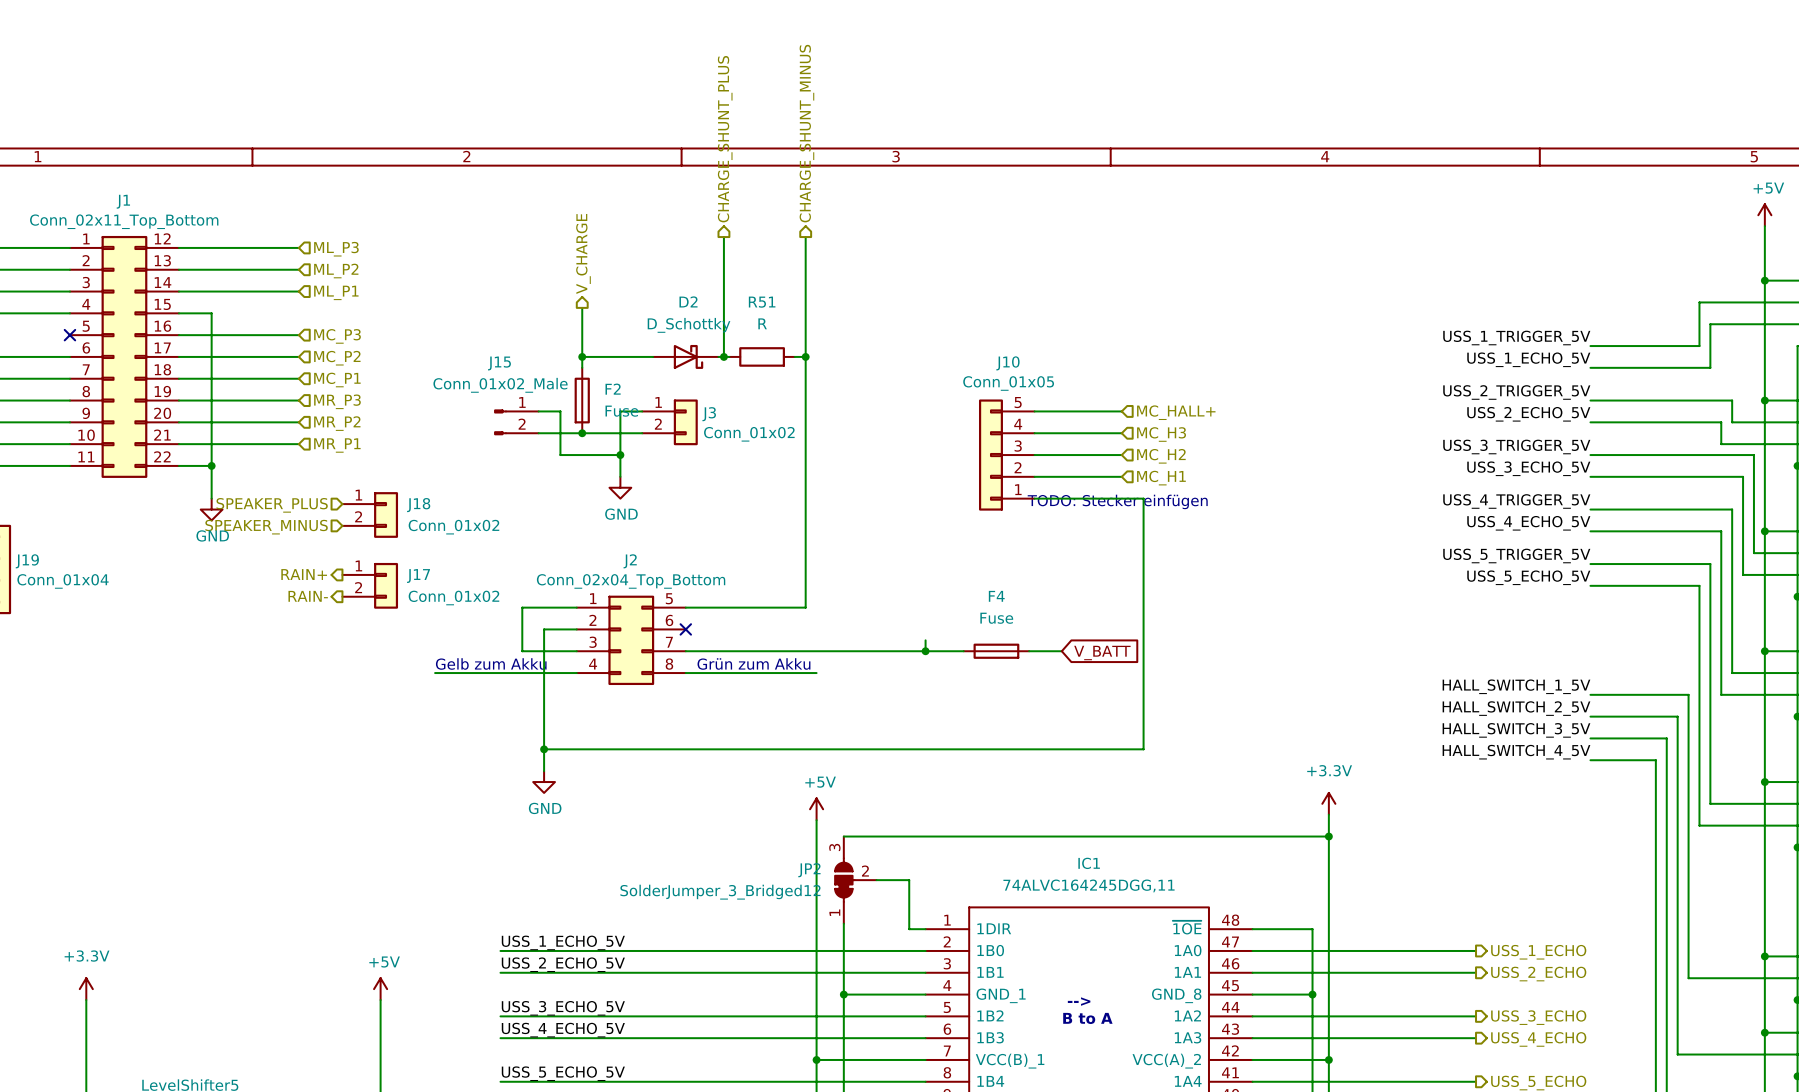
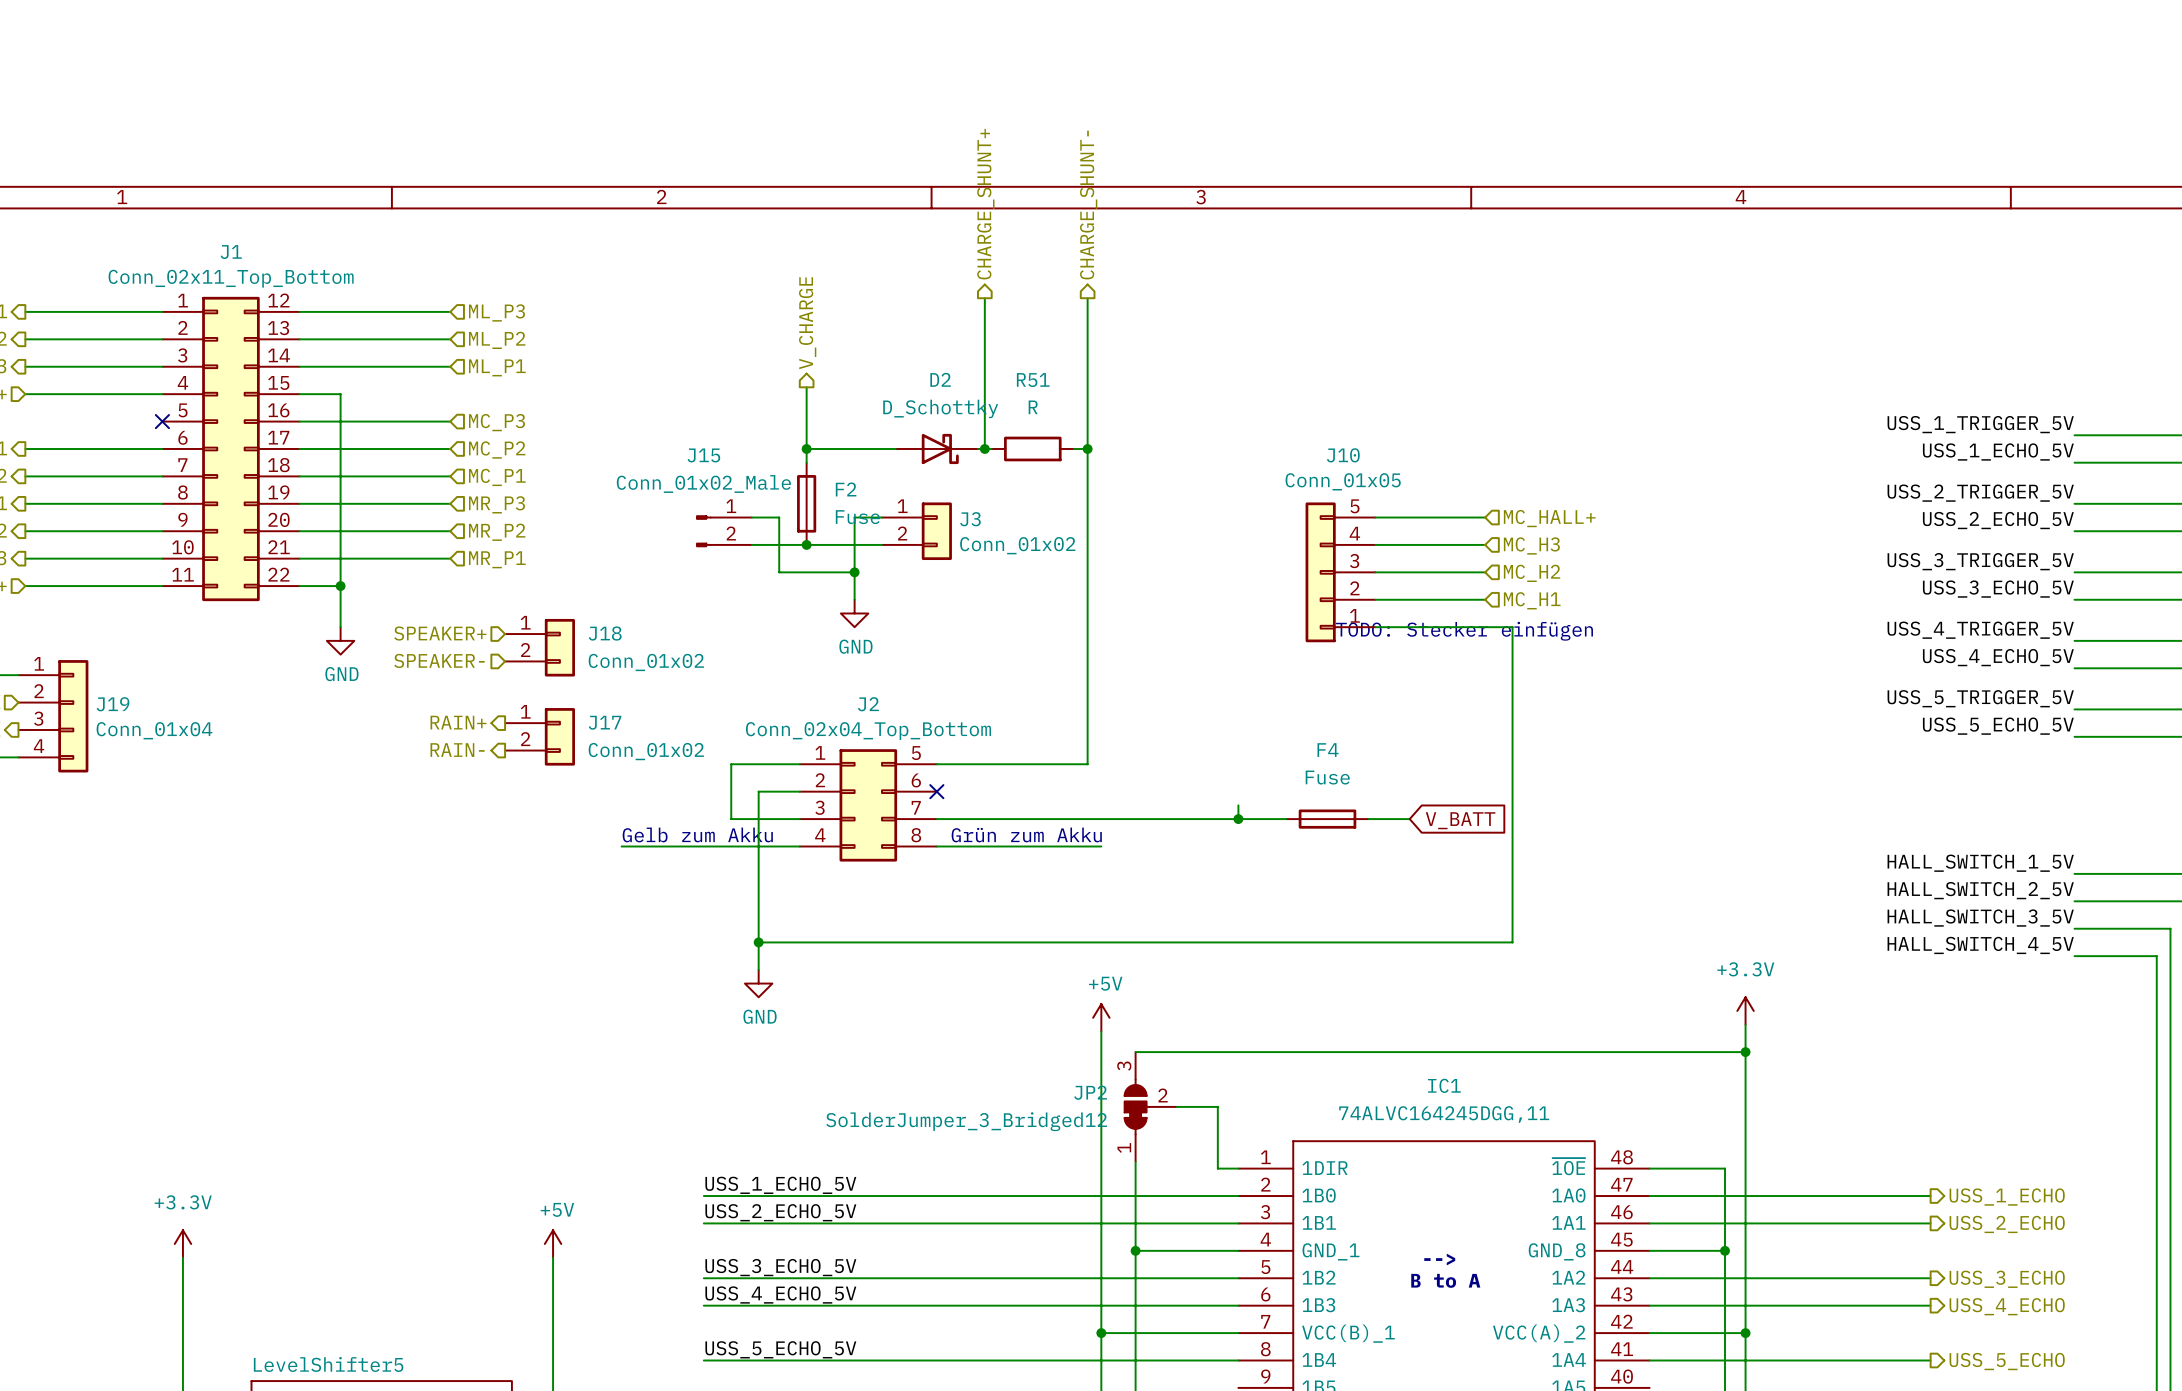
hierarchical label: CHARGE_SHUNT_MINUS (806, 133) -> CHARGE_SHUNT- (1088, 205)
hierarchical label: CHARGE_SHUNT_PLUS (725, 139) -> CHARGE_SHUNT+ (985, 204)
hierarchical label: SPEAKER_PLUS (272, 505) -> SPEAKER+ (440, 633)
hierarchical label: SPEAKER_MINUS (266, 527) -> SPEAKER- (439, 660)

